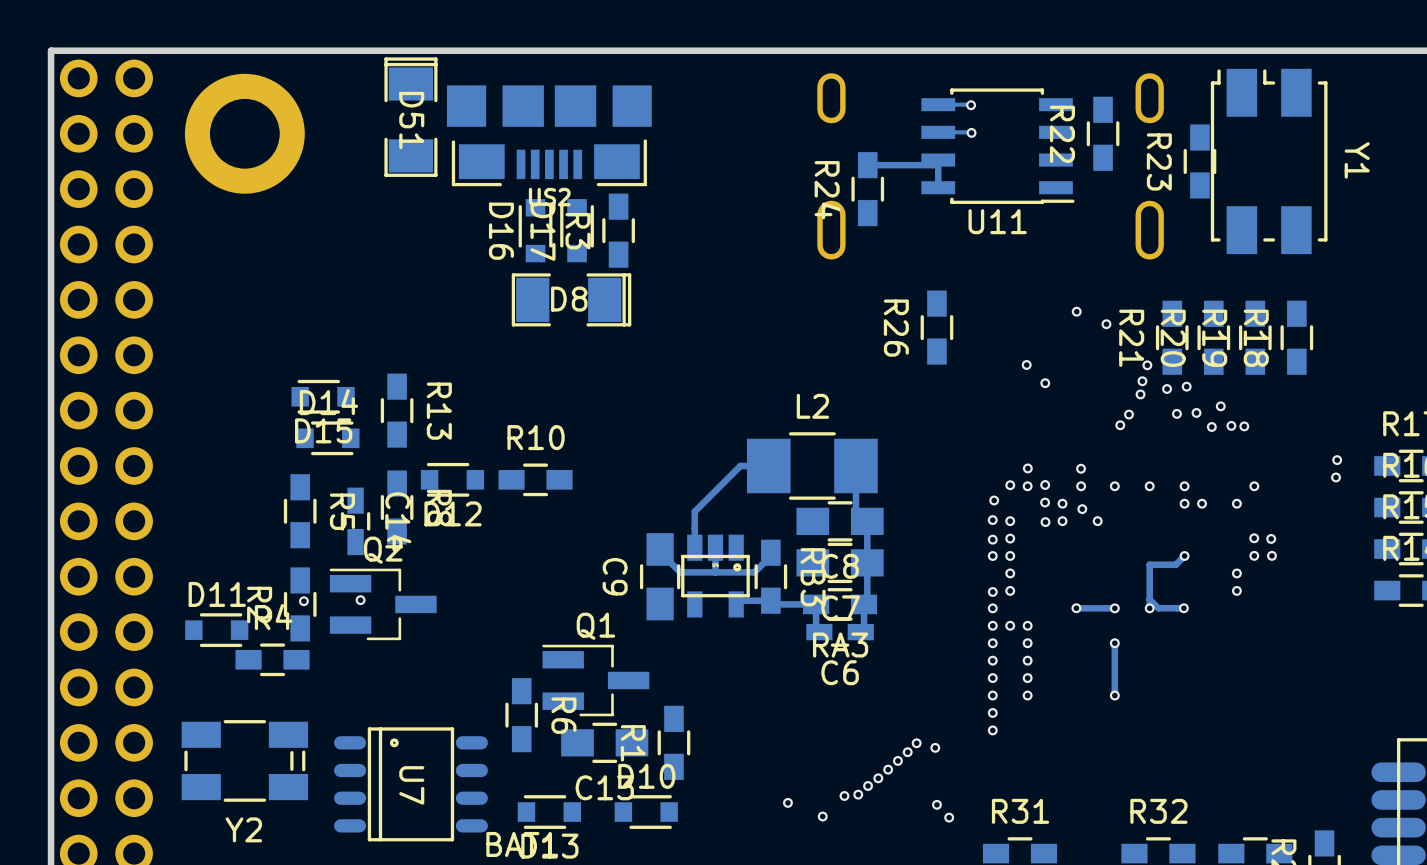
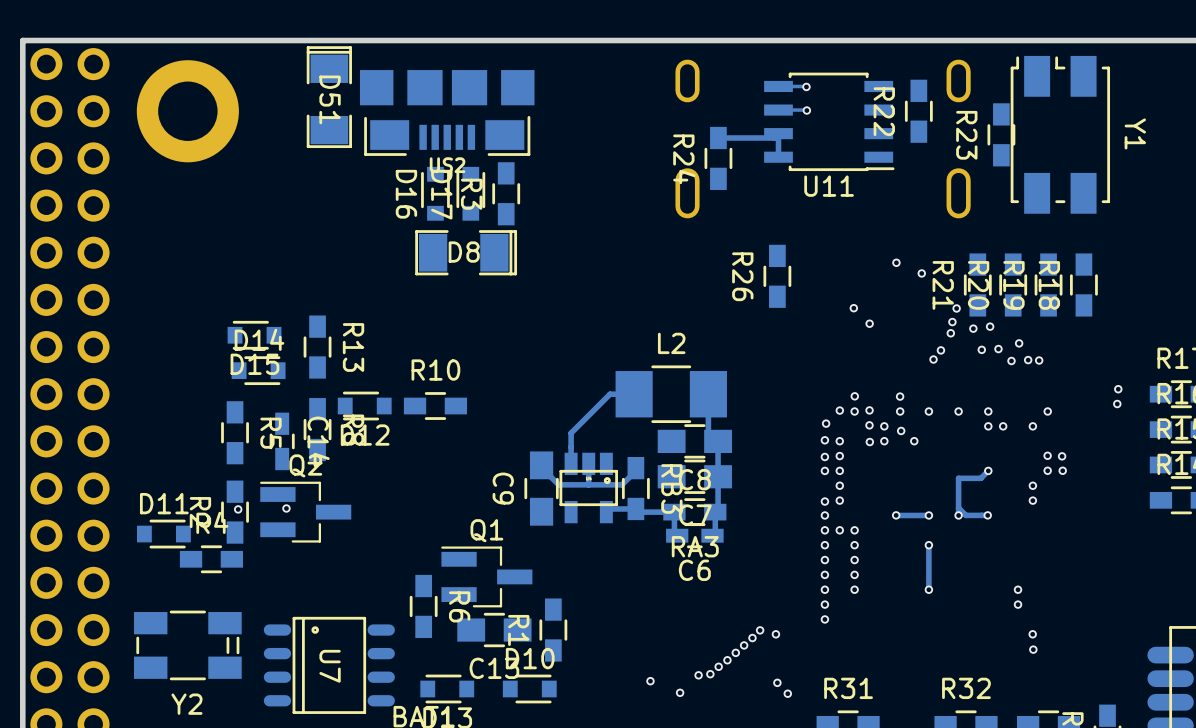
via: none -> (1018, 589)
via: none -> (1018, 604)
via: none -> (1032, 634)
via: none -> (1033, 649)

